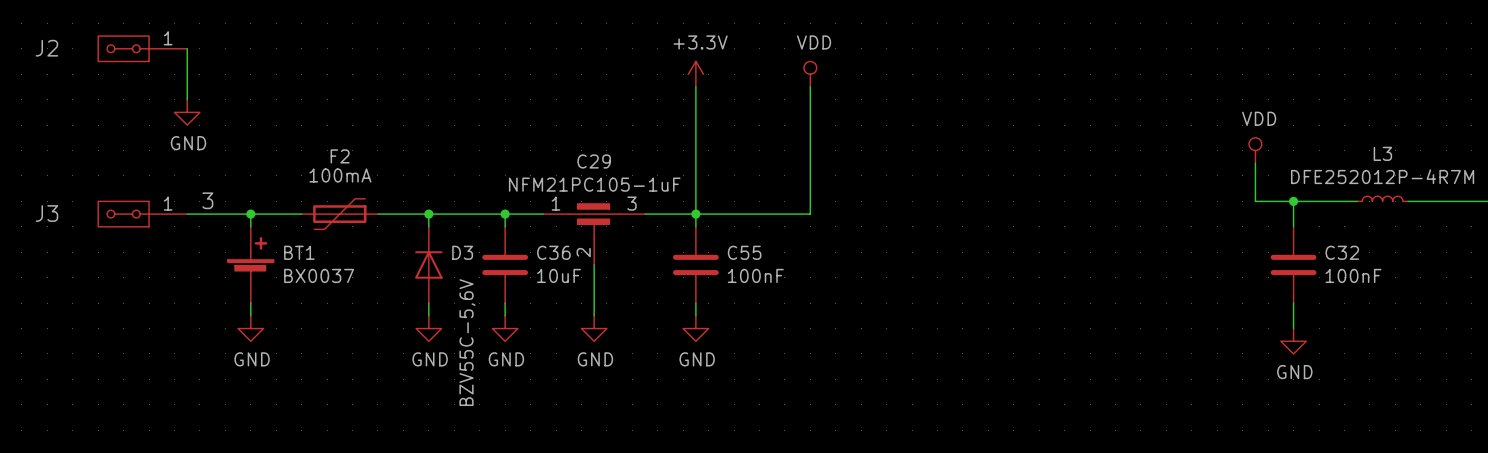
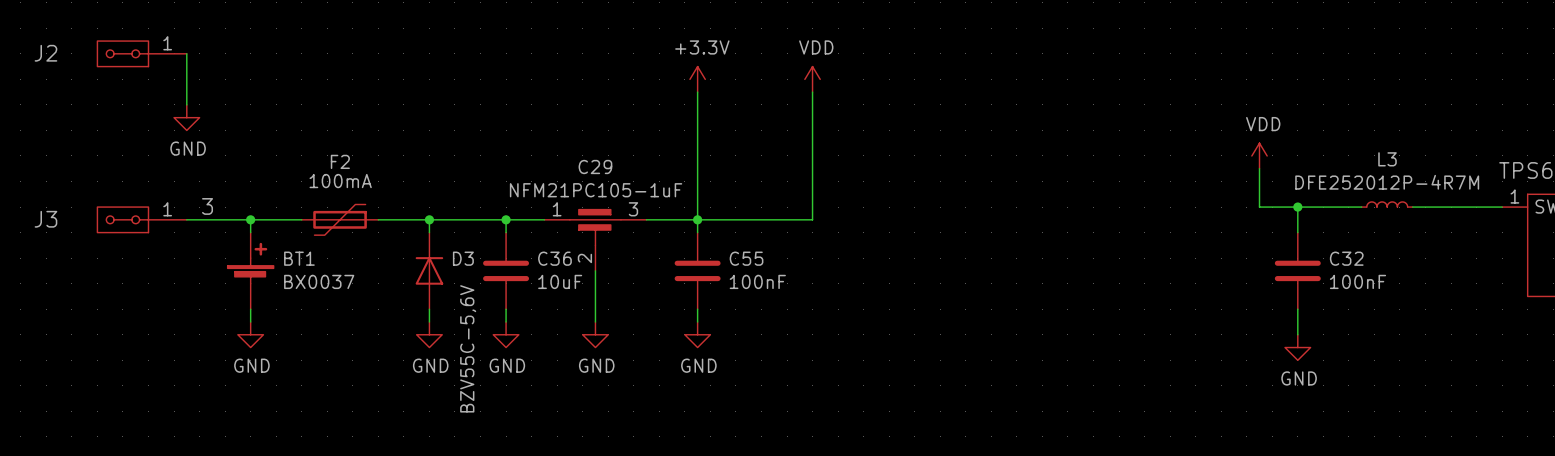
power symbol shape: [803, 61, 817, 87] -> [804, 66, 821, 93]
power symbol shape: [1249, 137, 1262, 164] -> [1251, 143, 1268, 169]

